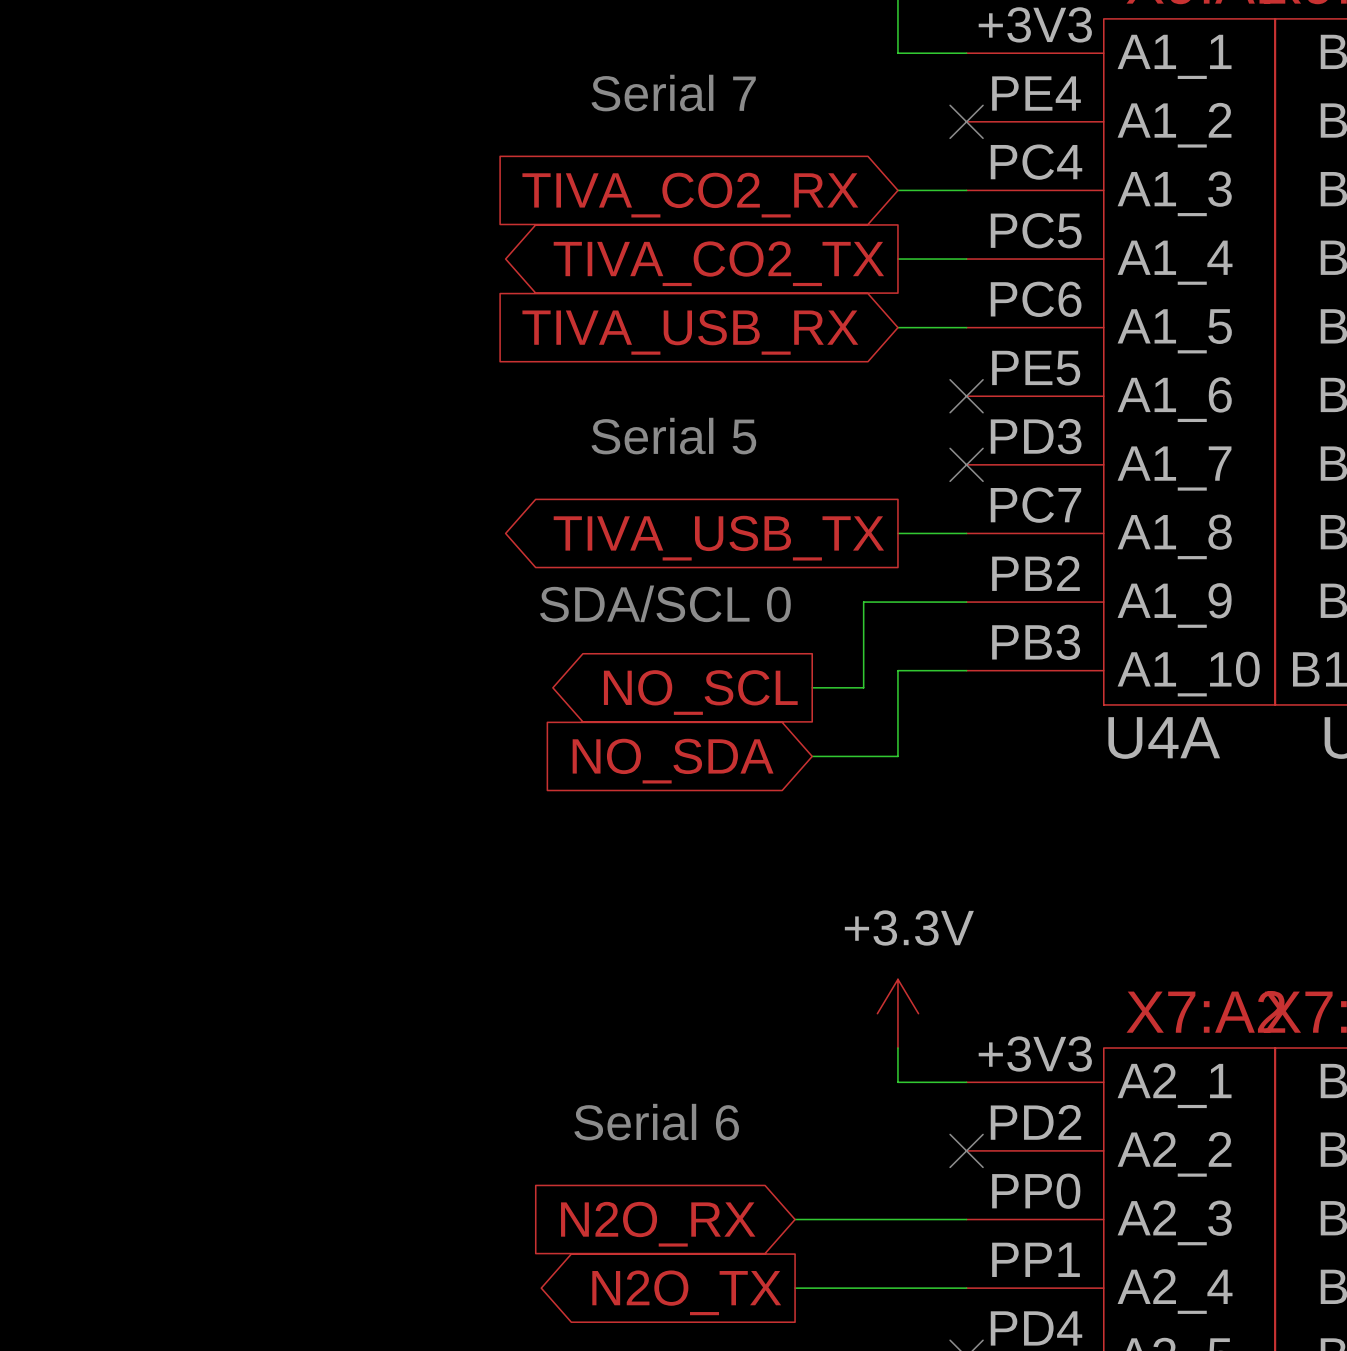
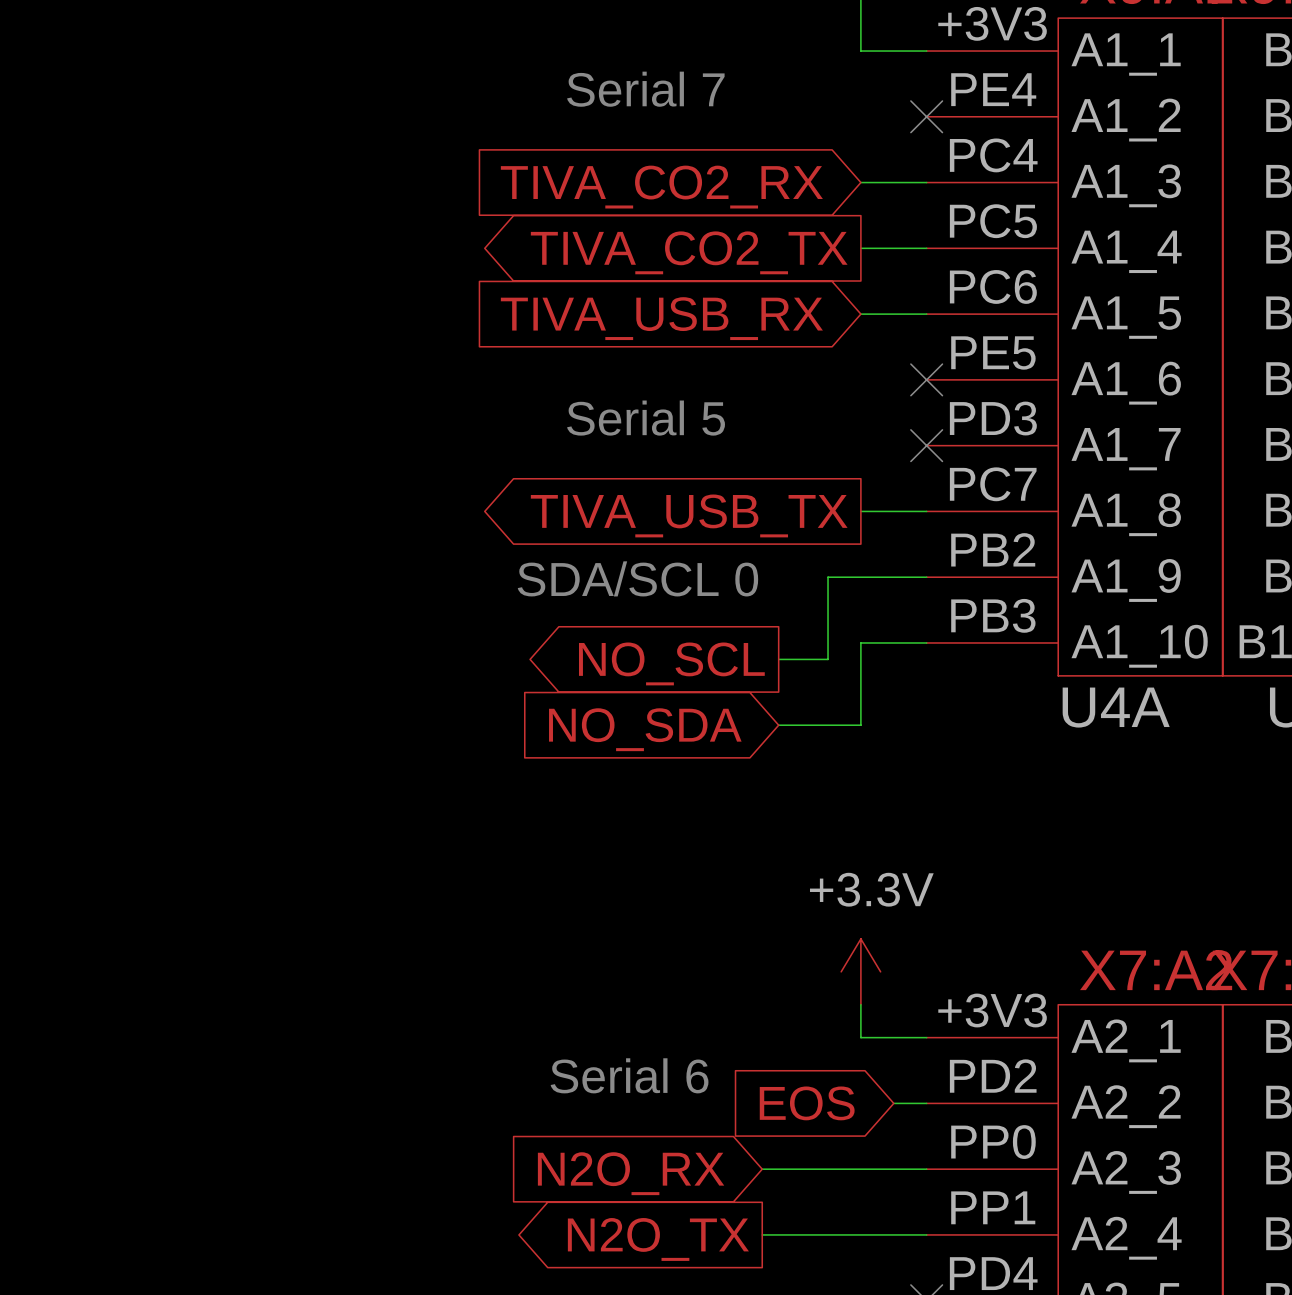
global label: none -> EOS (807, 1103)
wire: none -> (893, 1103) (926, 1103)
no-connect mark: (966, 1150) -> none

